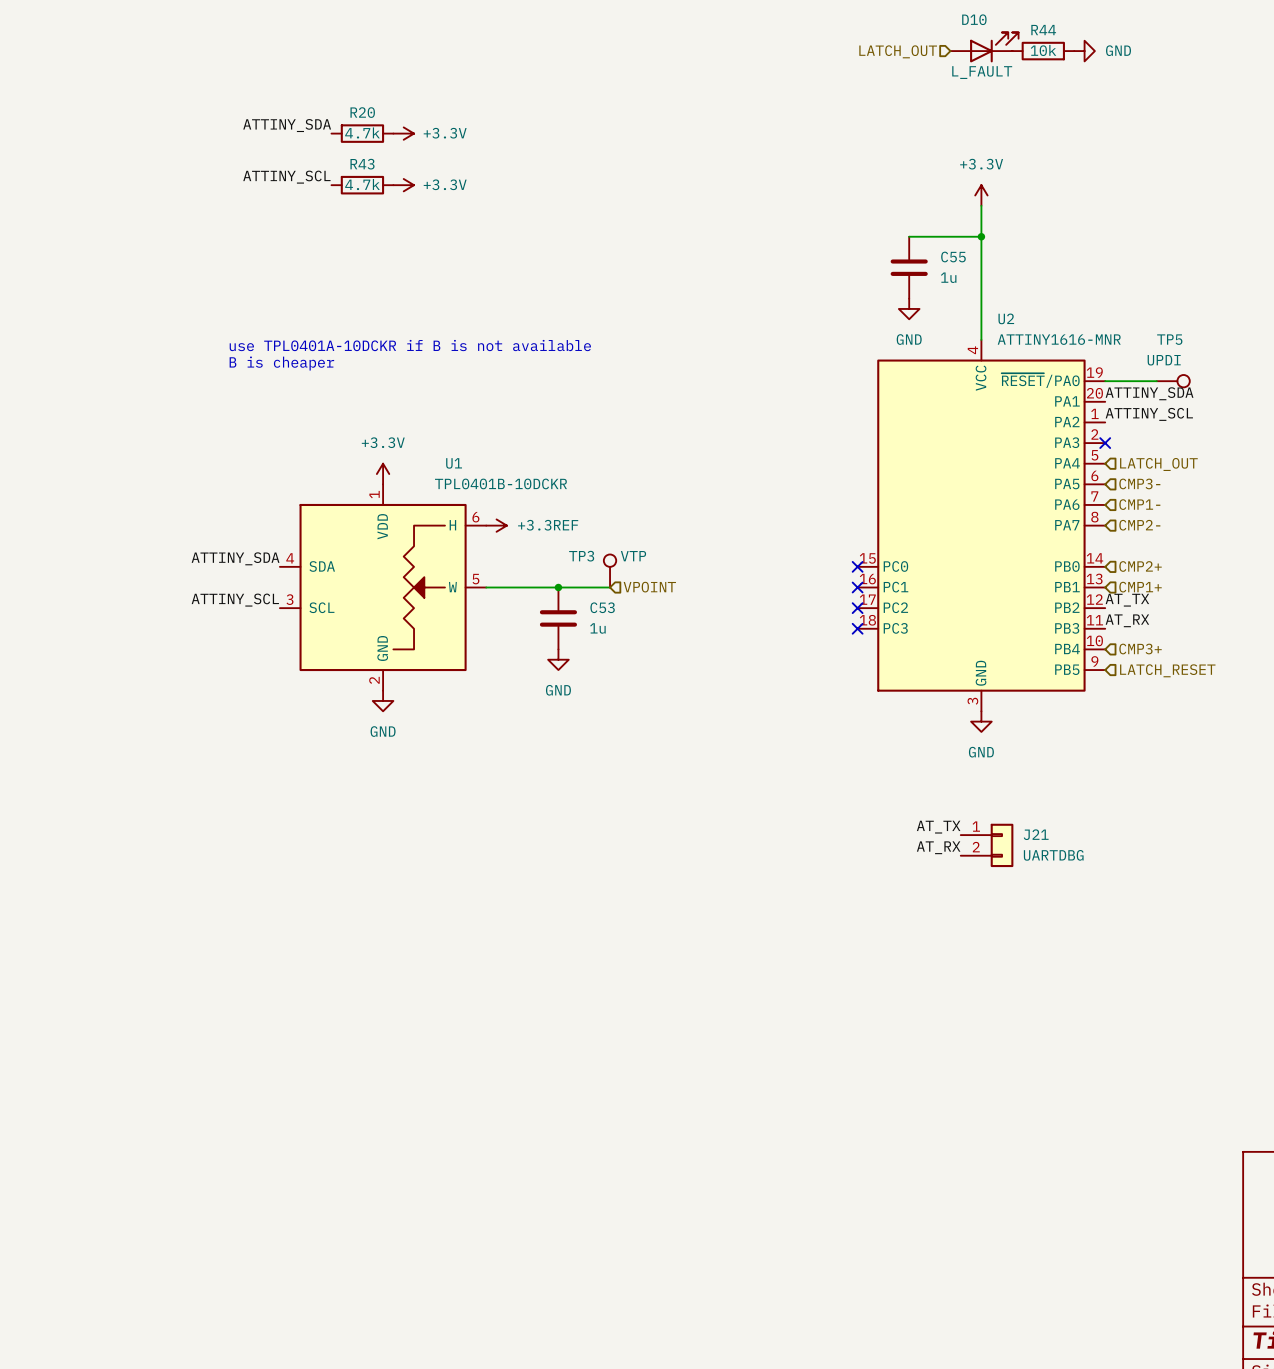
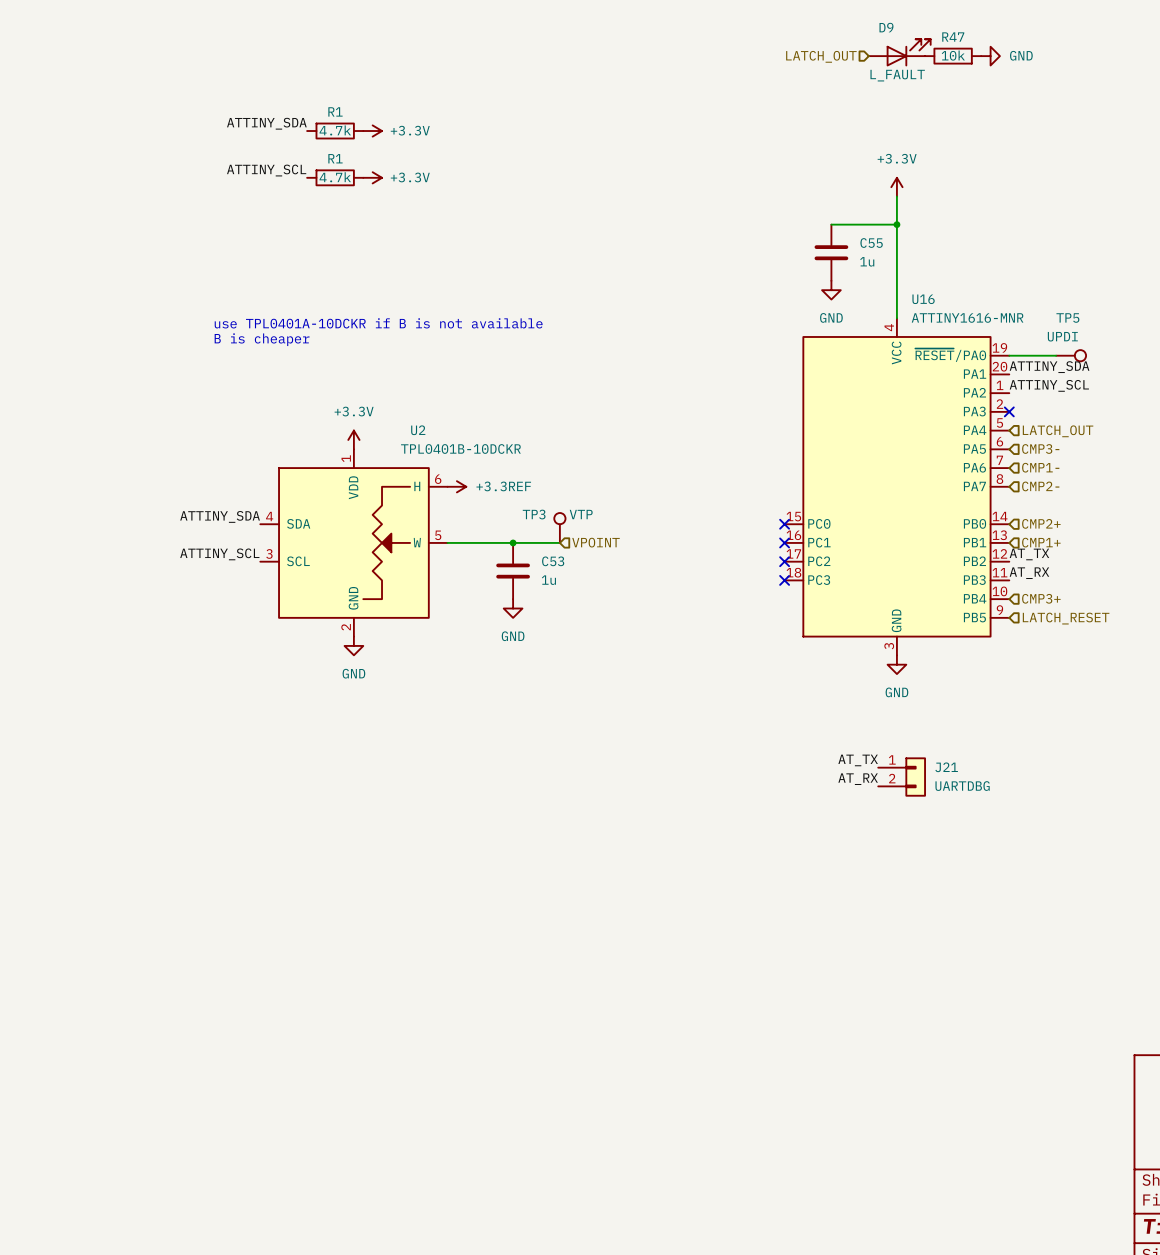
D10 name: D10 (974, 19) -> D9 (886, 27)
R44 name: R44 (1043, 30) -> R47 (953, 37)
R20 name: R20 (362, 112) -> R1 (335, 111)
R43 name: R43 (362, 164) -> R1 (335, 158)
U2 name: U2 (1006, 318) -> U16 (923, 299)
U1 name: U1 (454, 463) -> U2 (418, 430)

